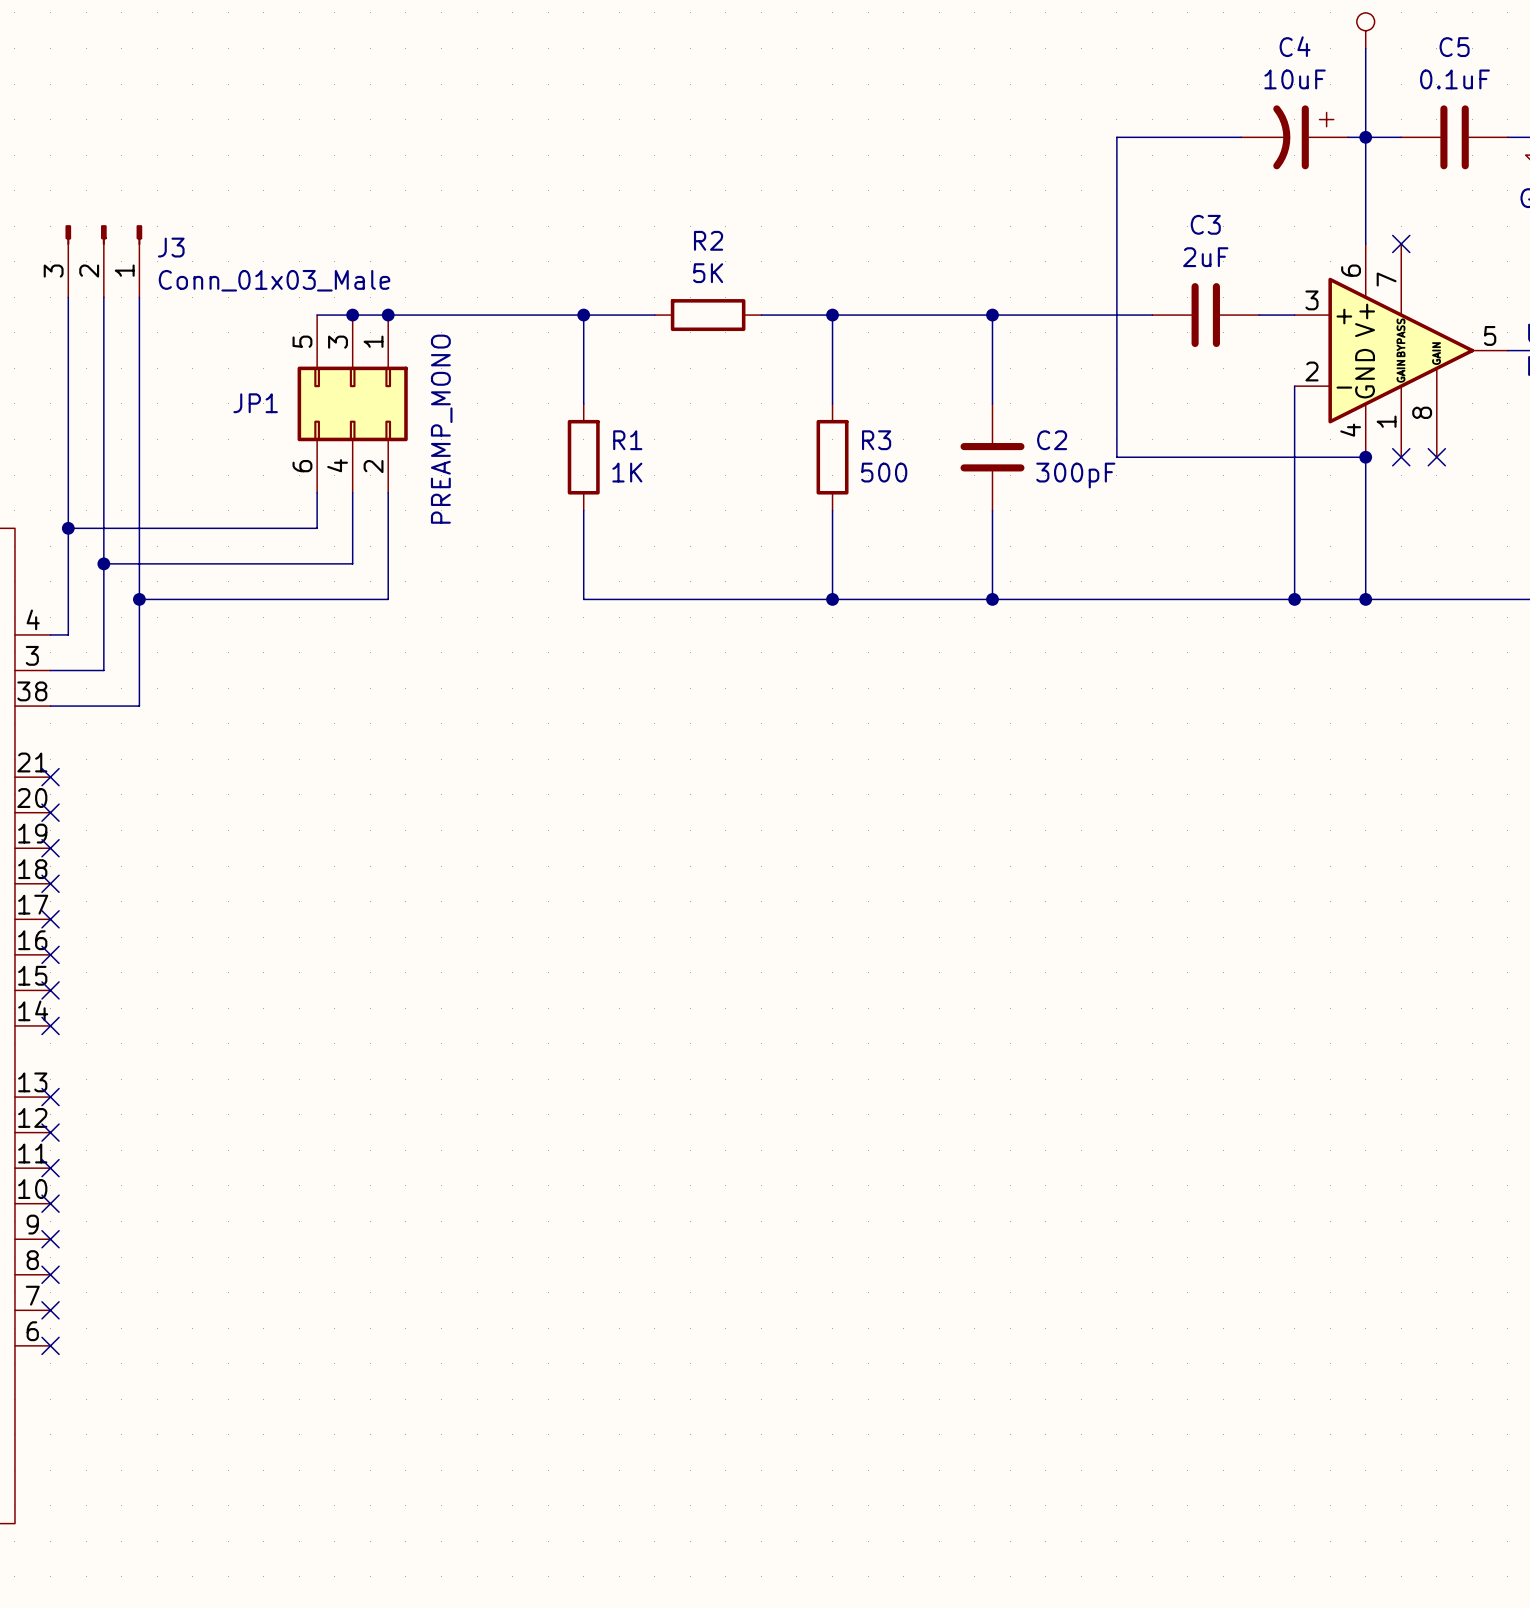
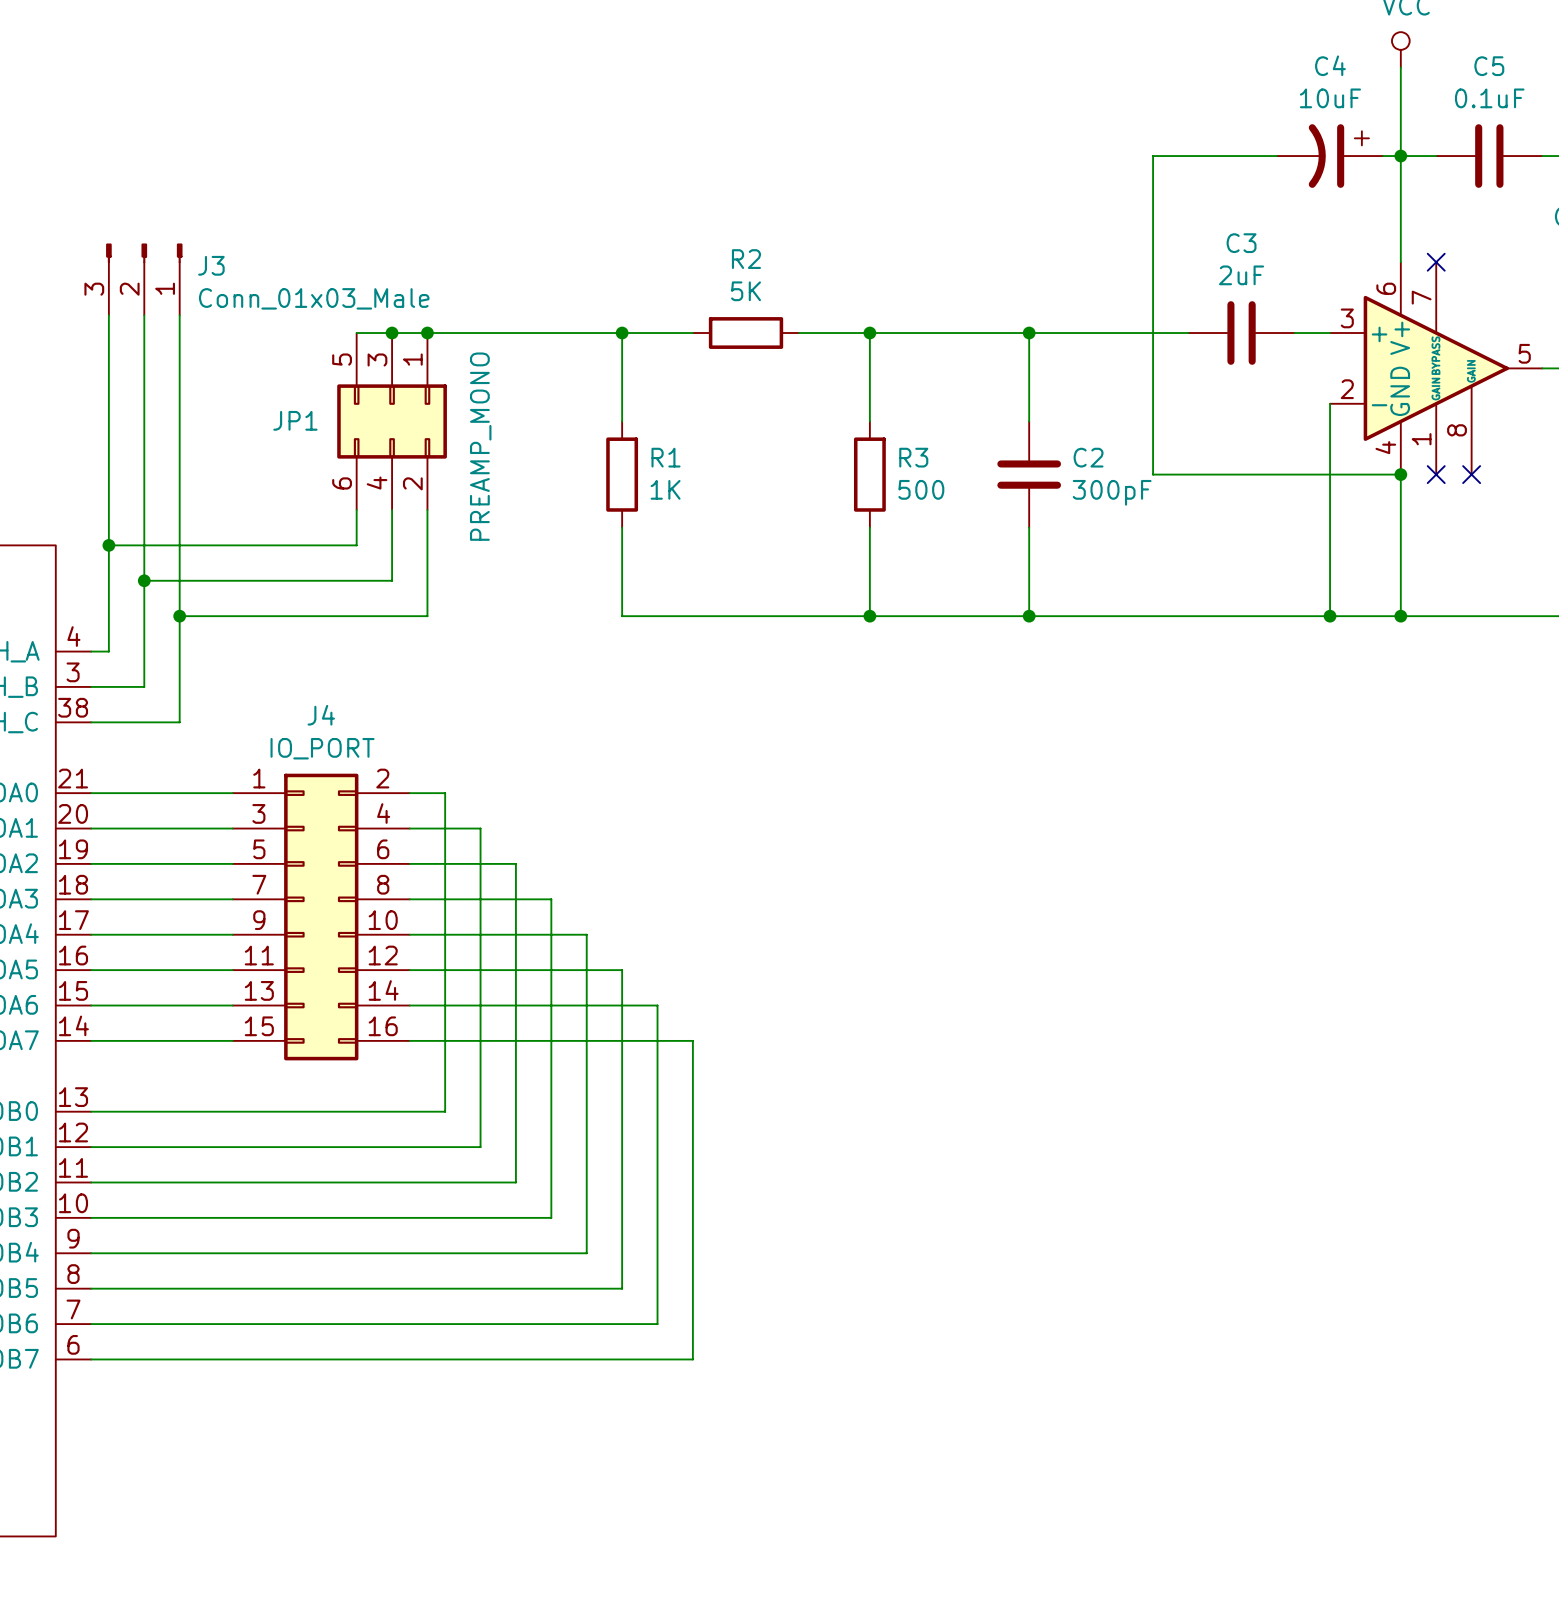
wire: none -> (91, 793) (232, 793)
no-connect mark: (50, 777) -> none
wire: none -> (409, 793) (445, 793) (445, 1111) (91, 1111)
wire: none -> (91, 828) (232, 828)
no-connect mark: (50, 812) -> none
wire: none -> (409, 828) (480, 828) (480, 1147) (91, 1147)
wire: none -> (91, 863) (232, 863)
no-connect mark: (50, 848) -> none
wire: none -> (409, 863) (515, 863) (515, 1182) (91, 1182)
wire: none -> (91, 899) (232, 899)
no-connect mark: (50, 883) -> none
wire: none -> (409, 899) (551, 899) (551, 1217) (91, 1217)
J4: none -> IO_PORT (321, 917)
wire: none -> (91, 934) (232, 934)
no-connect mark: (50, 919) -> none
wire: none -> (409, 934) (586, 934) (586, 1253) (91, 1253)
wire: none -> (91, 970) (232, 970)
no-connect mark: (50, 954) -> none
wire: none -> (409, 970) (622, 970) (622, 1288) (91, 1288)
wire: none -> (91, 1005) (232, 1005)
no-connect mark: (50, 990) -> none
wire: none -> (409, 1005) (657, 1005) (657, 1324) (91, 1324)
wire: none -> (91, 1040) (232, 1040)
no-connect mark: (50, 1025) -> none
wire: none -> (409, 1040) (692, 1040) (692, 1359) (91, 1359)
no-connect mark: (50, 1097) -> none
no-connect mark: (50, 1132) -> none
no-connect mark: (50, 1168) -> none
no-connect mark: (50, 1203) -> none
no-connect mark: (50, 1239) -> none
no-connect mark: (50, 1274) -> none
no-connect mark: (50, 1310) -> none
no-connect mark: (50, 1345) -> none

